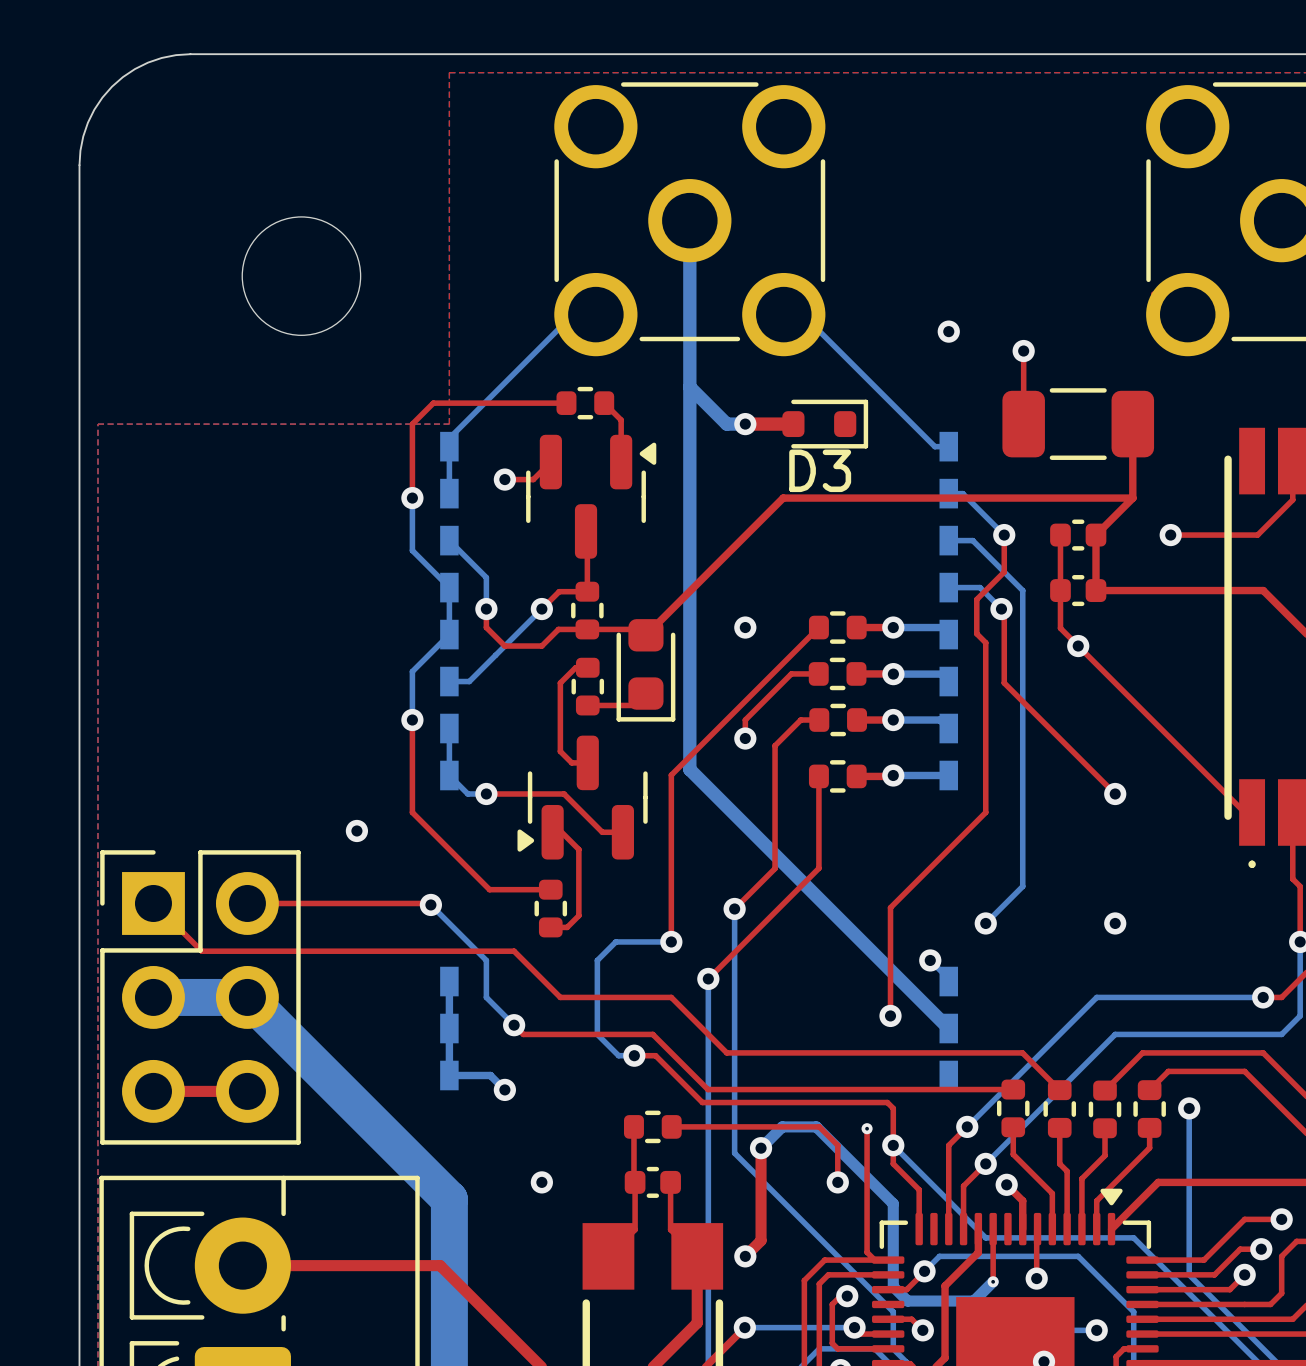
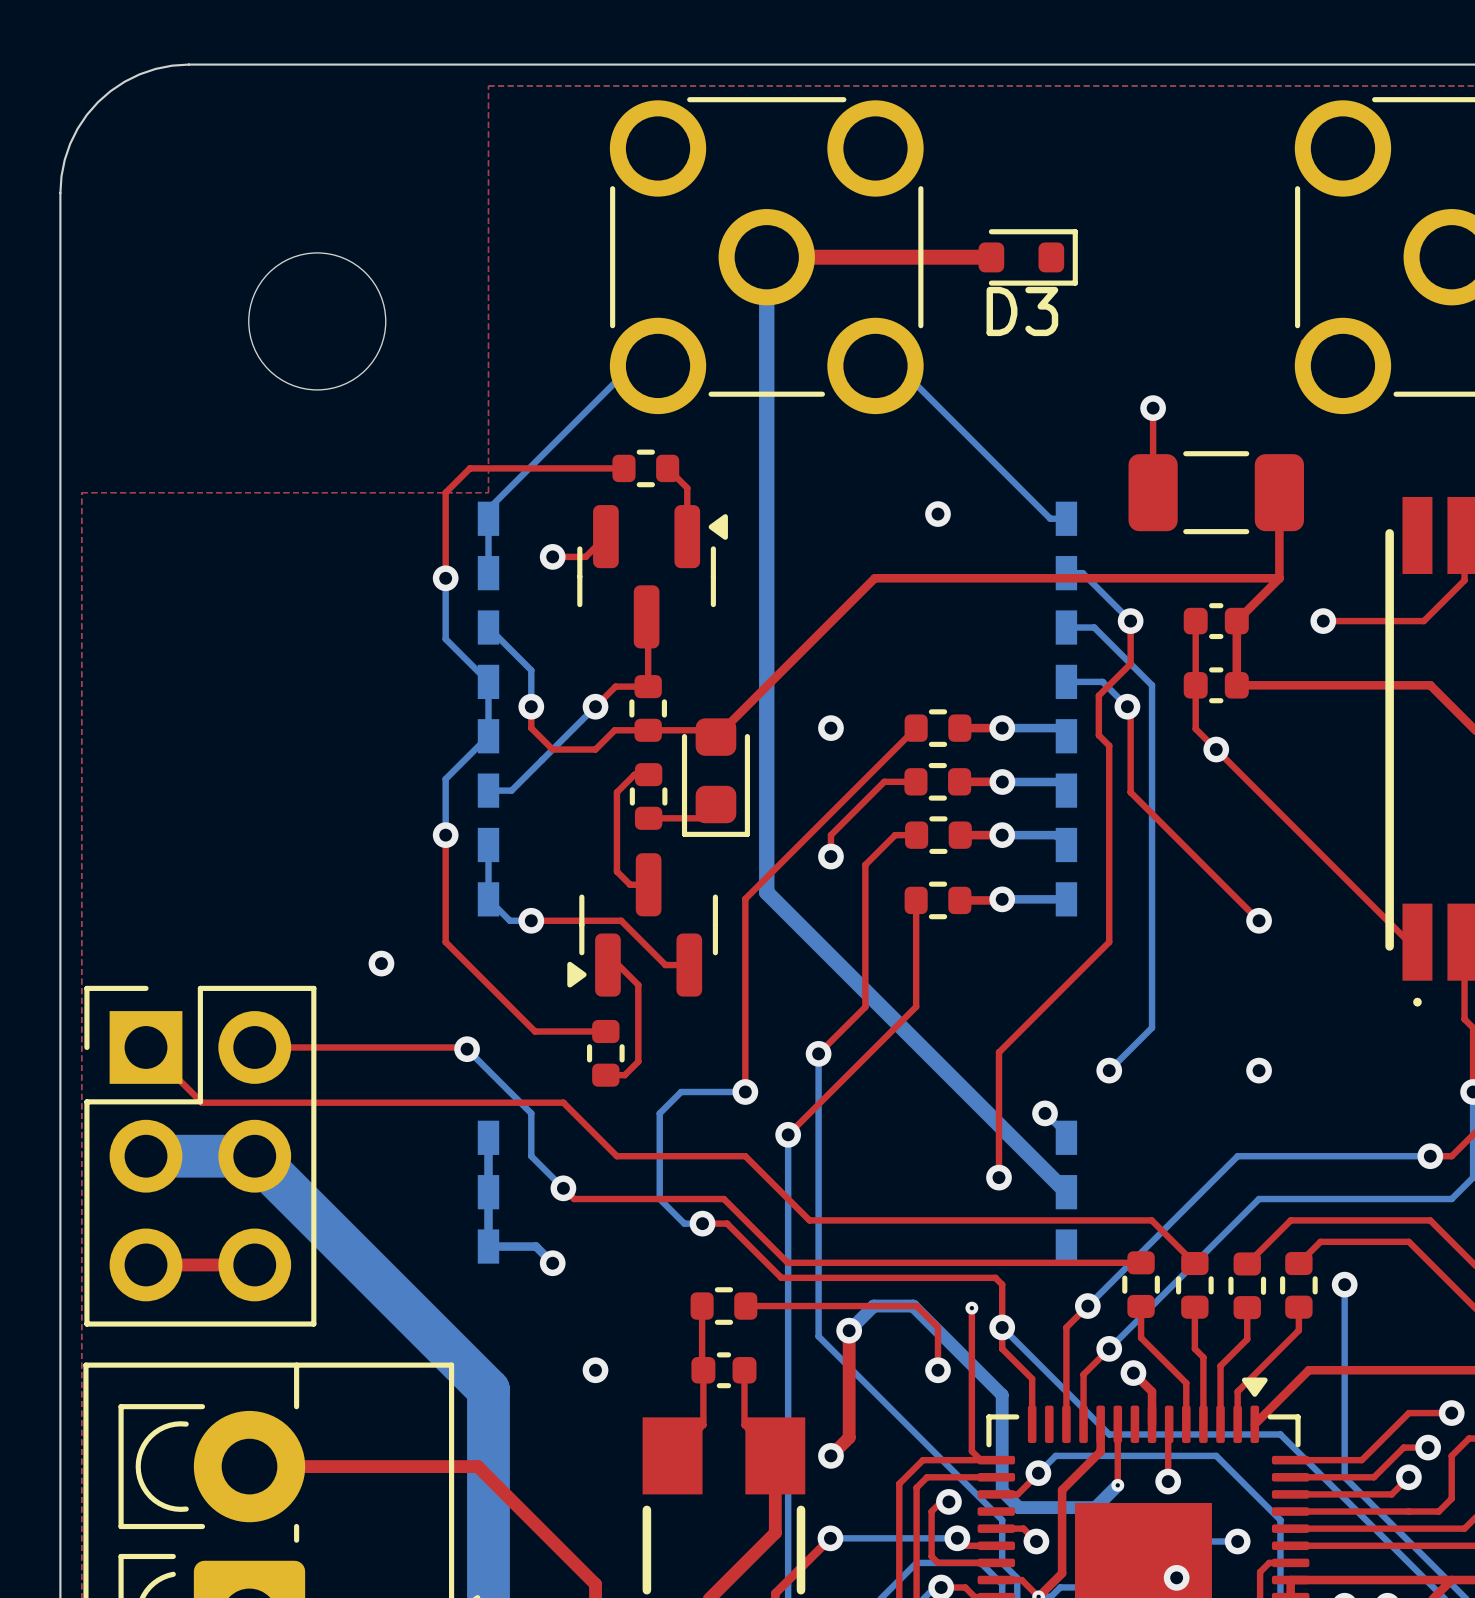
top track: none -> (766, 257) (991, 257)
via: (948, 331) -> none
bottom track: (689, 387) (726, 424) (745, 424) -> none
top track: (745, 424) (793, 424) -> none
via: (745, 424) -> none
D3 position: (825, 424) -> (1028, 257)
via: none -> (937, 514)

